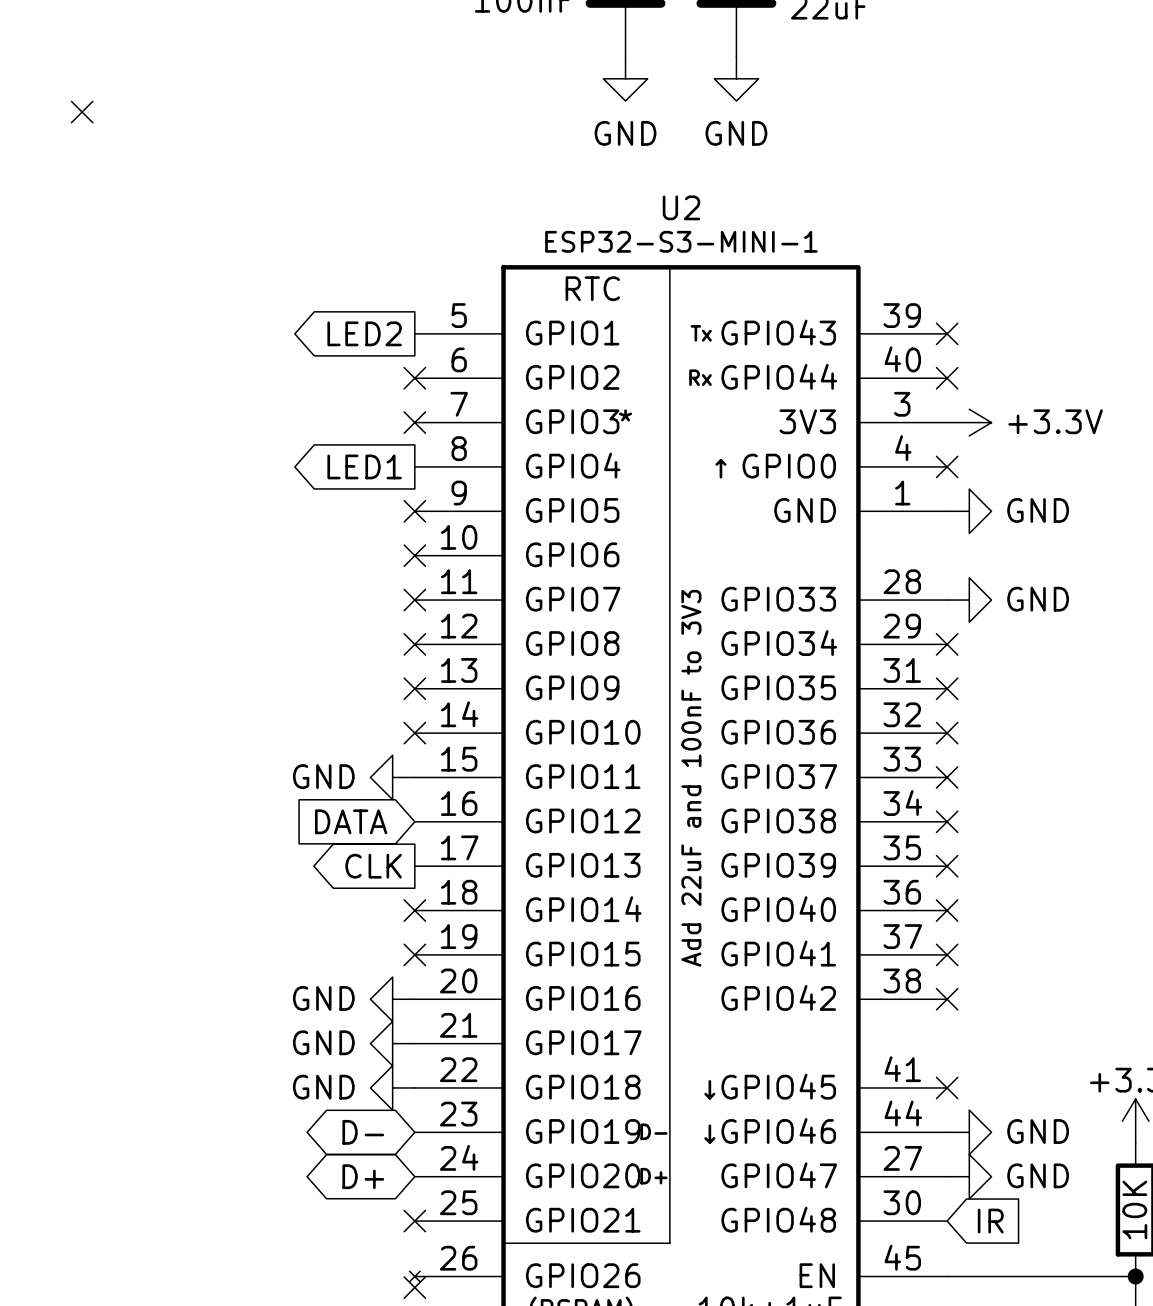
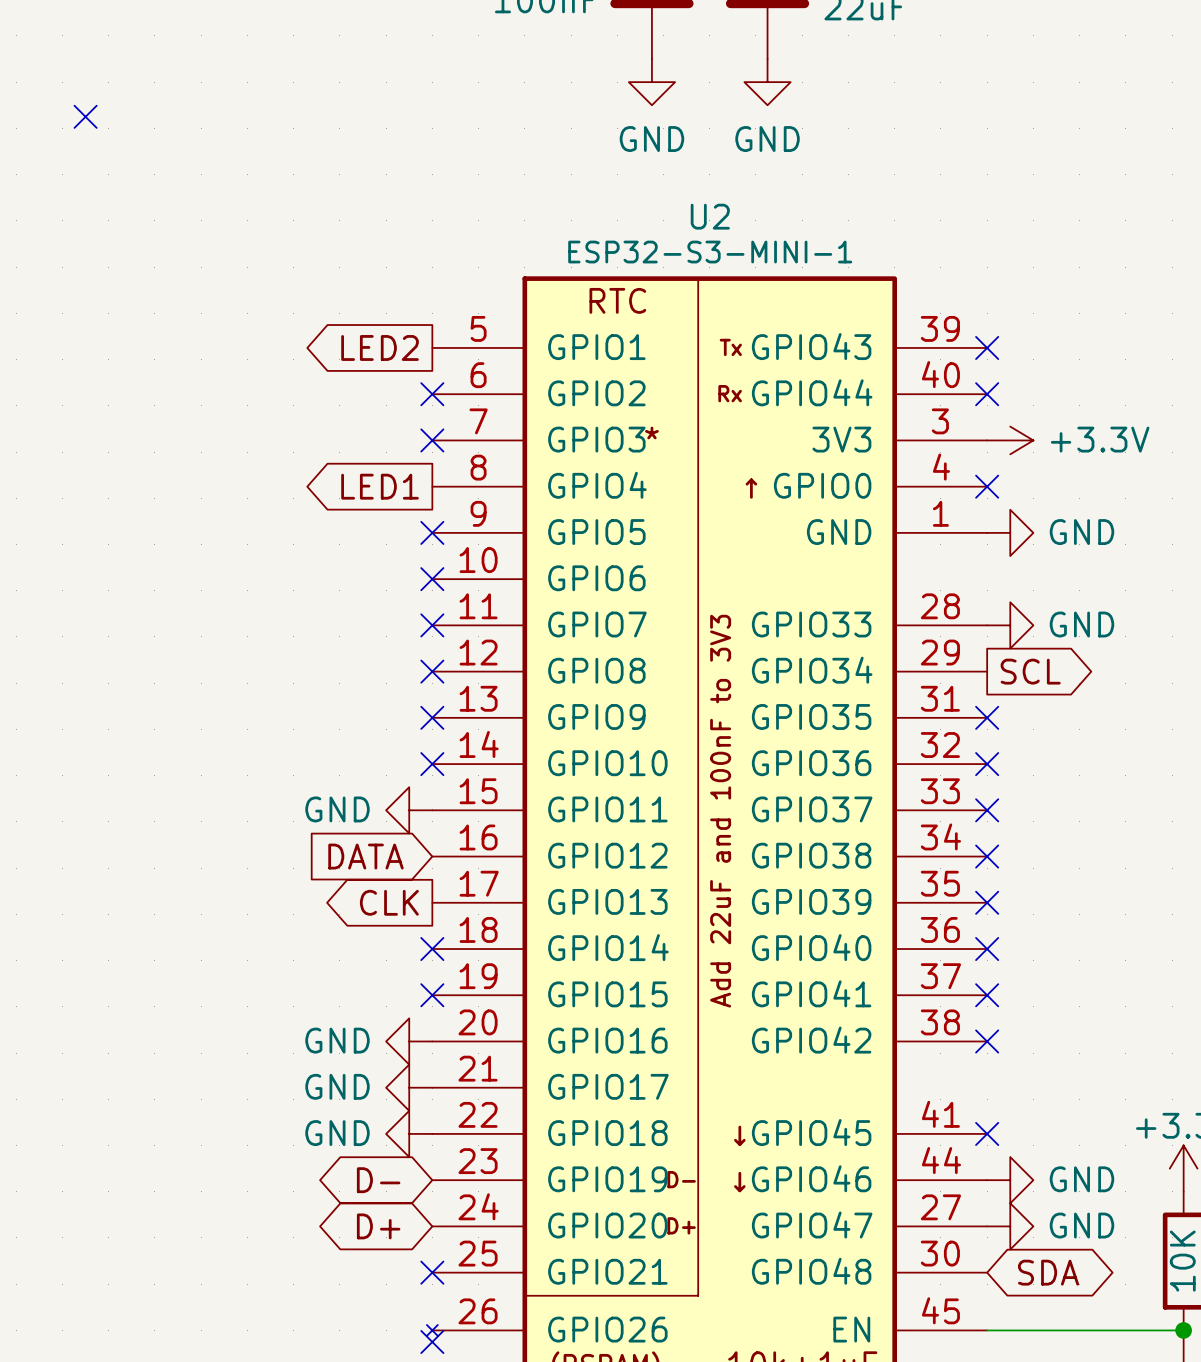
no-connect mark: (947, 644) -> none
global label: none -> SCL (1030, 671)
global label shape: input (990, 1221) -> bidirectional (1048, 1272)
global label: IR (990, 1221) -> SDA (1048, 1272)

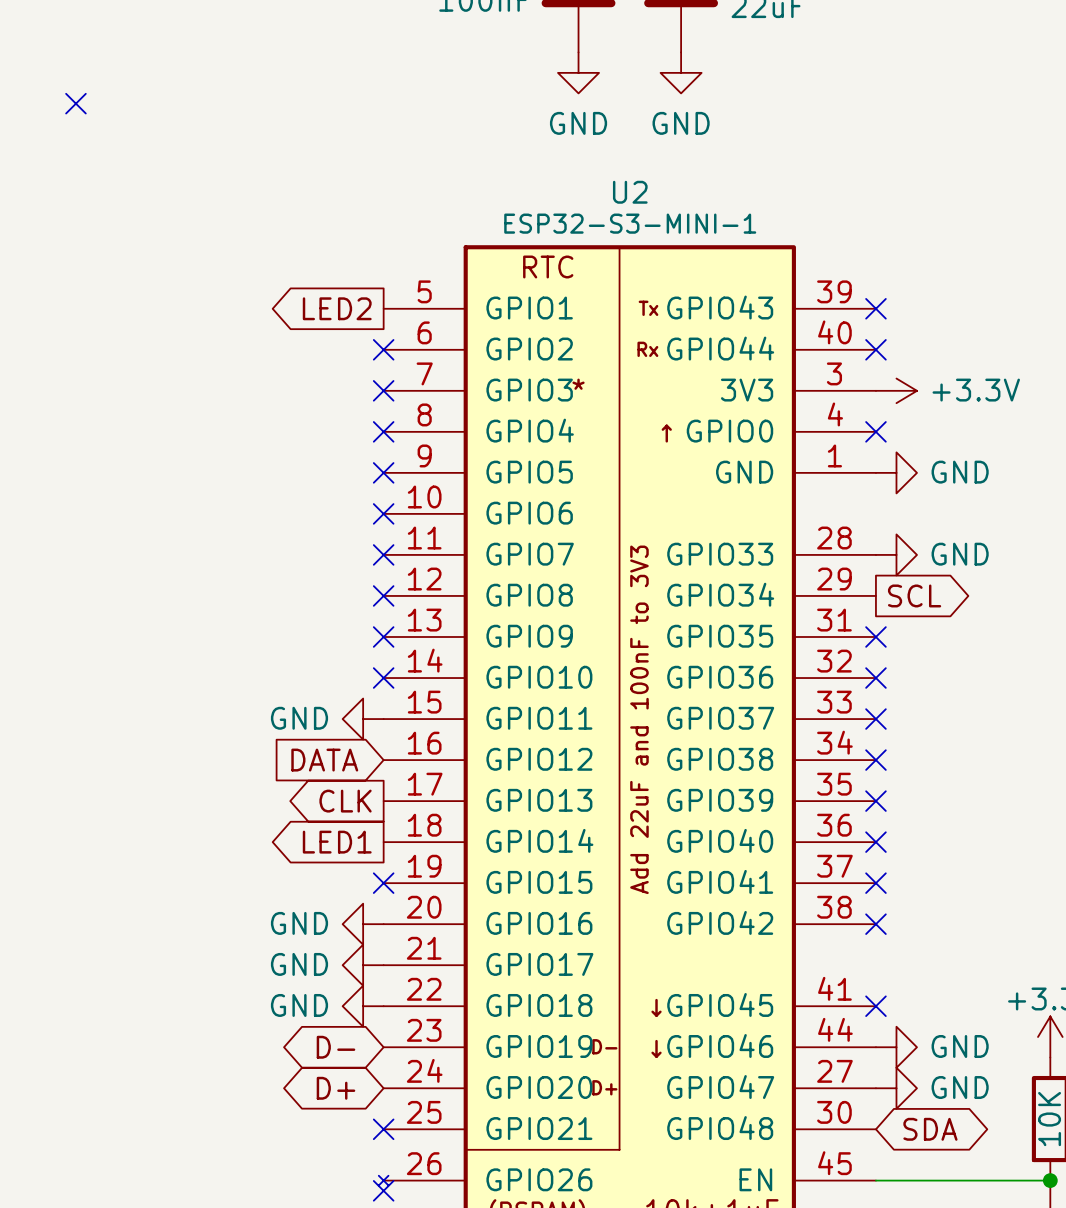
global label: LED1 (380, 486) -> none
no-connect mark: none -> (383, 431)
global label: none -> LED1 (337, 842)
no-connect mark: (432, 949) -> none

